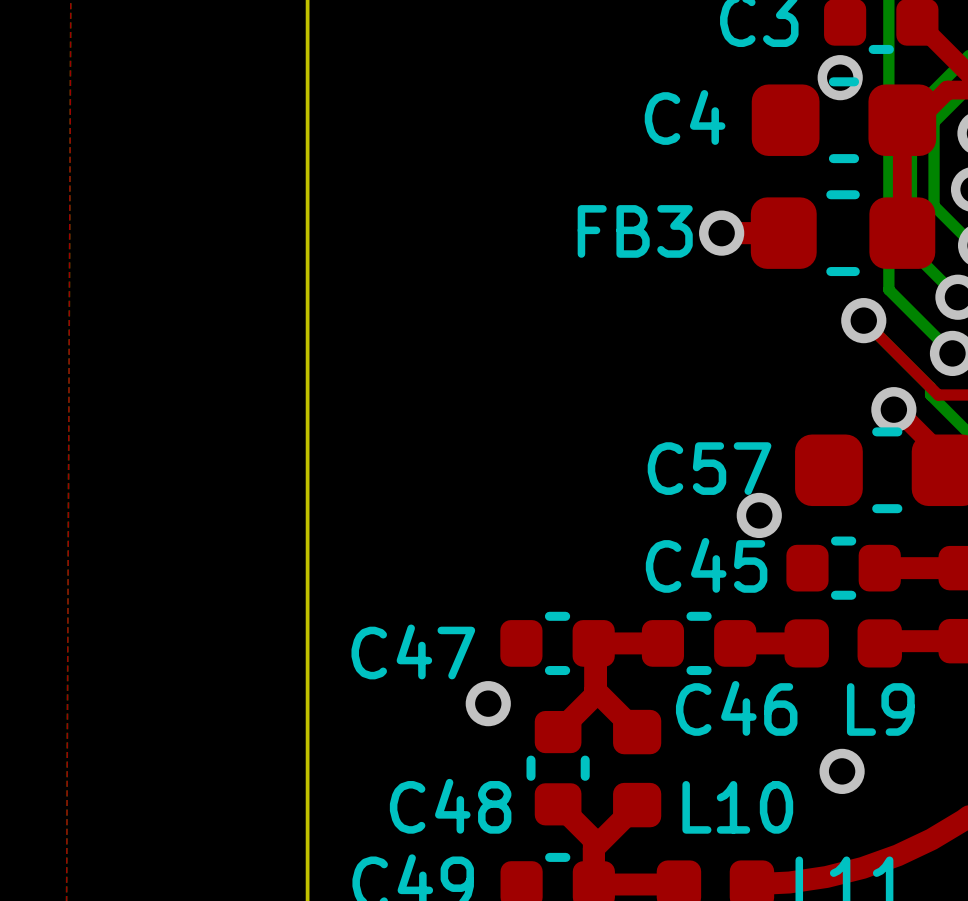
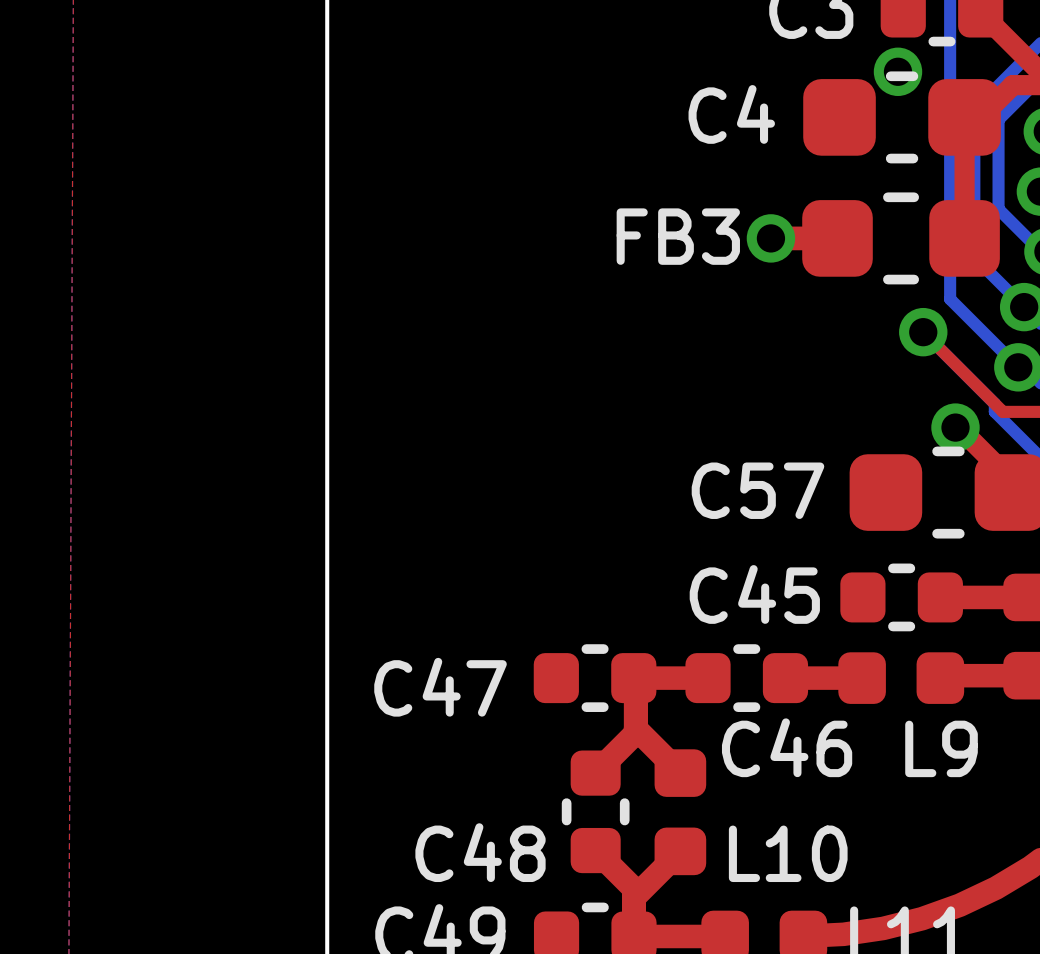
via: (759, 515) -> none
via: (488, 703) -> none
via: (842, 771) -> none

